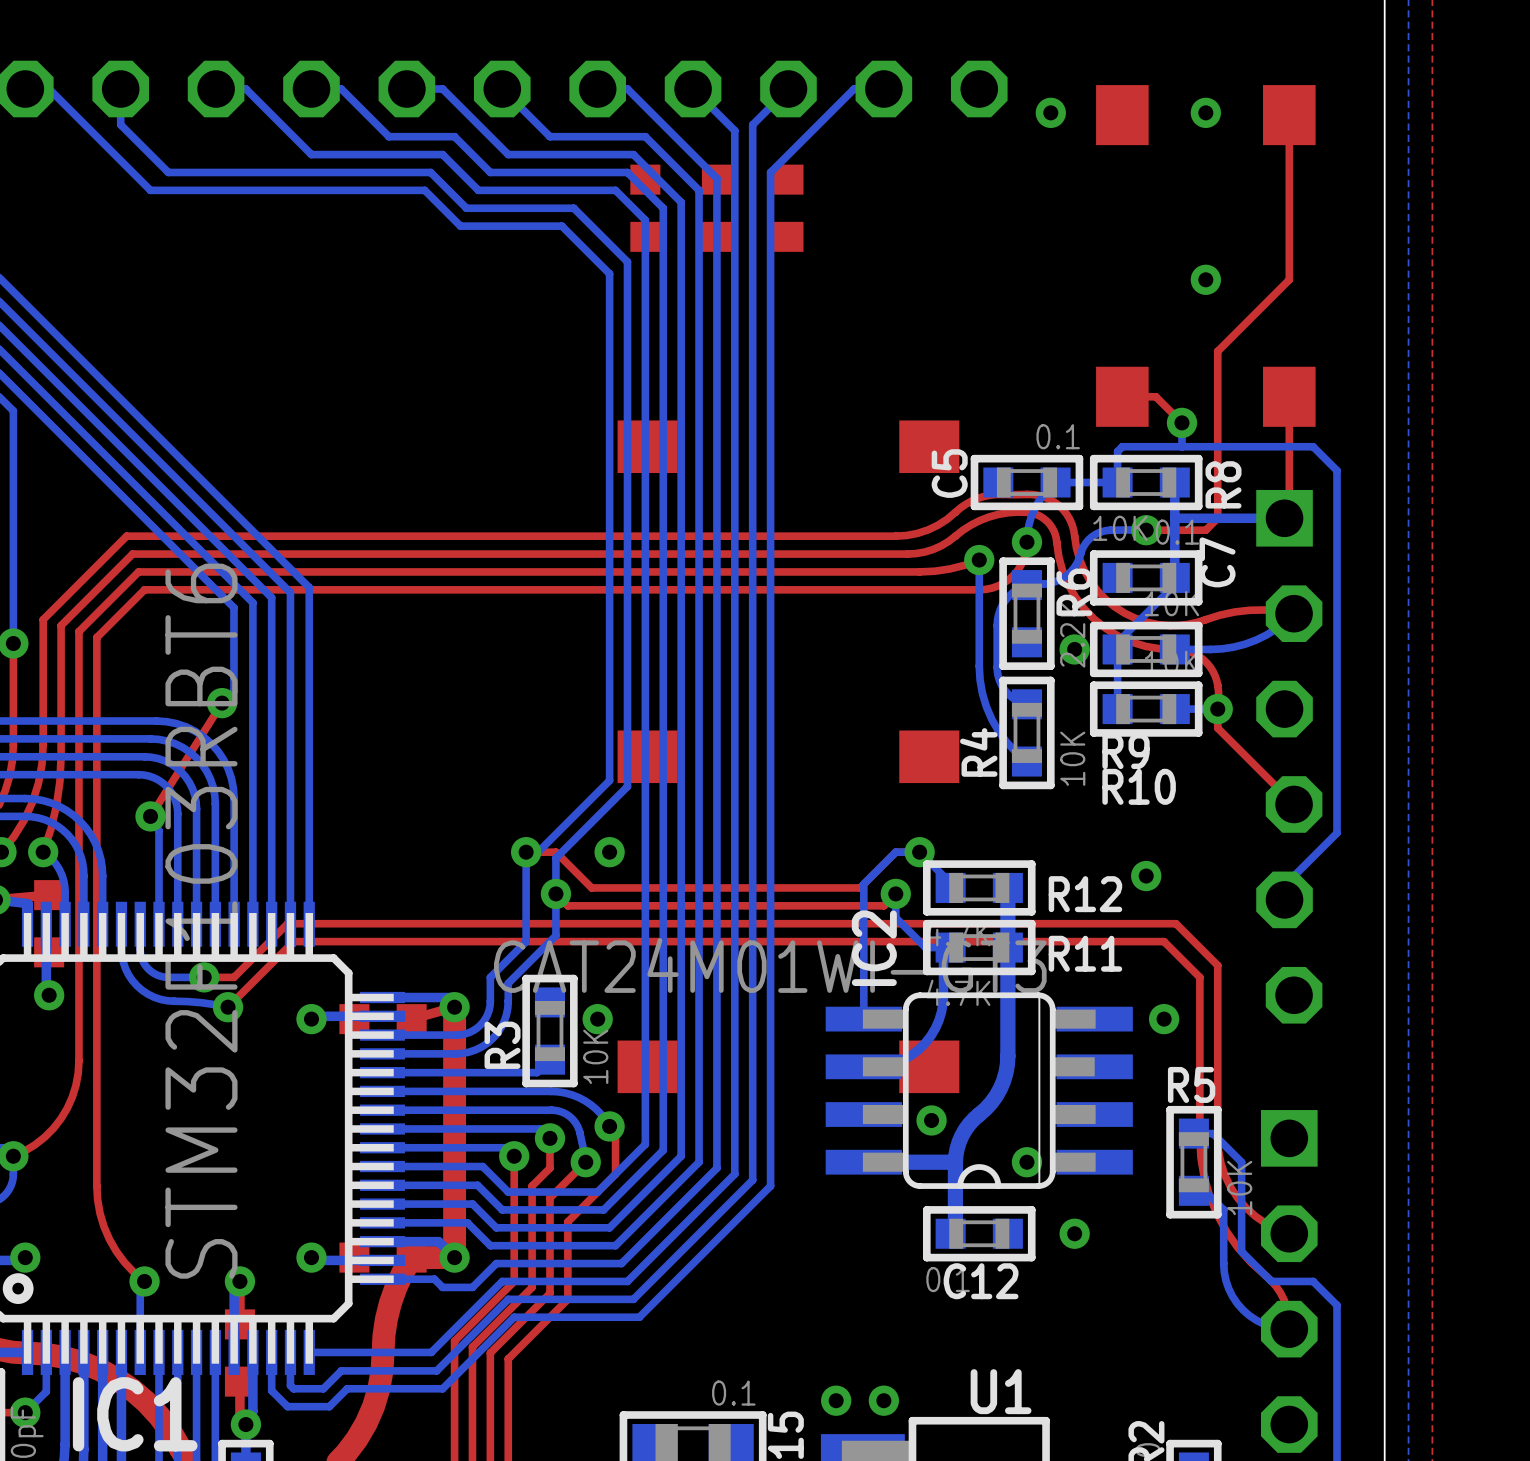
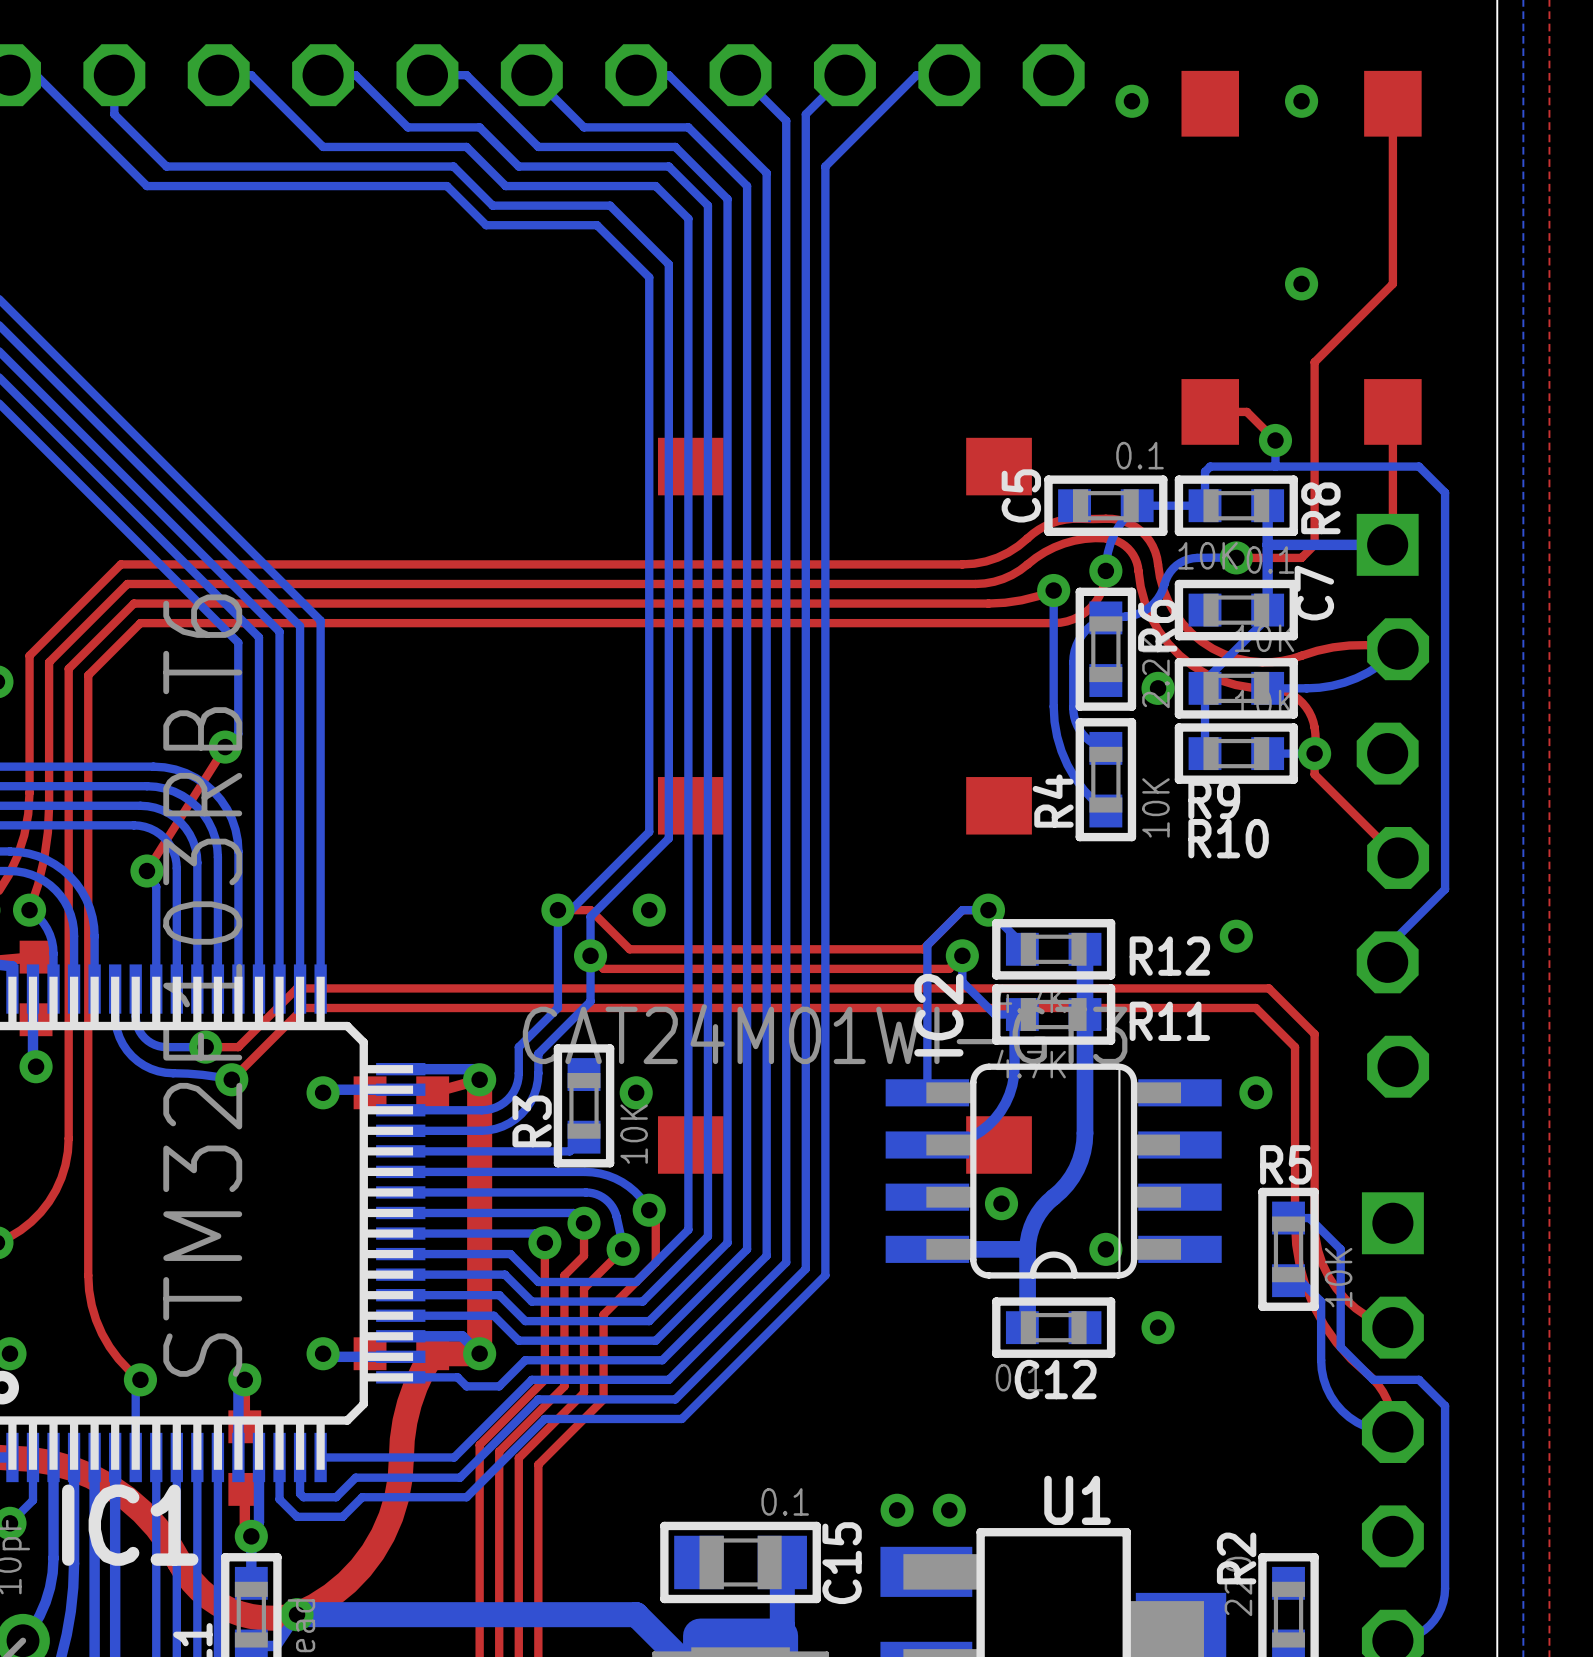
part: (645, 208) -> none
part: (716, 208) -> none
part: (788, 208) -> none

